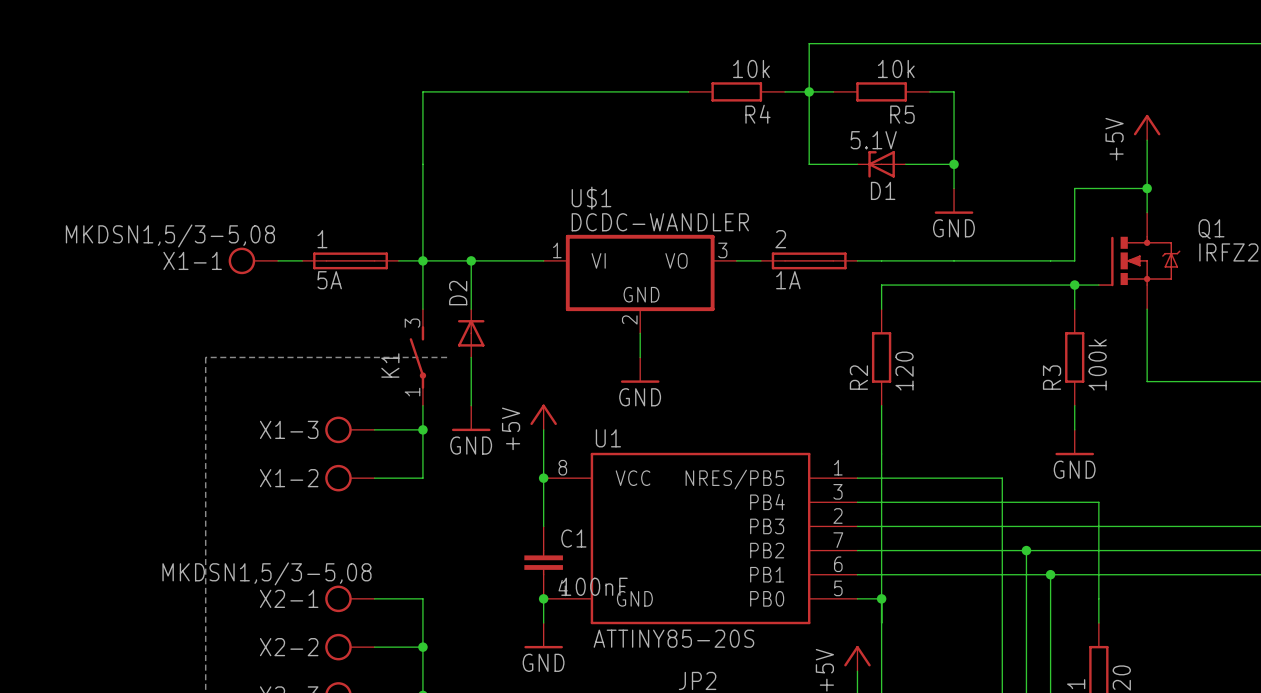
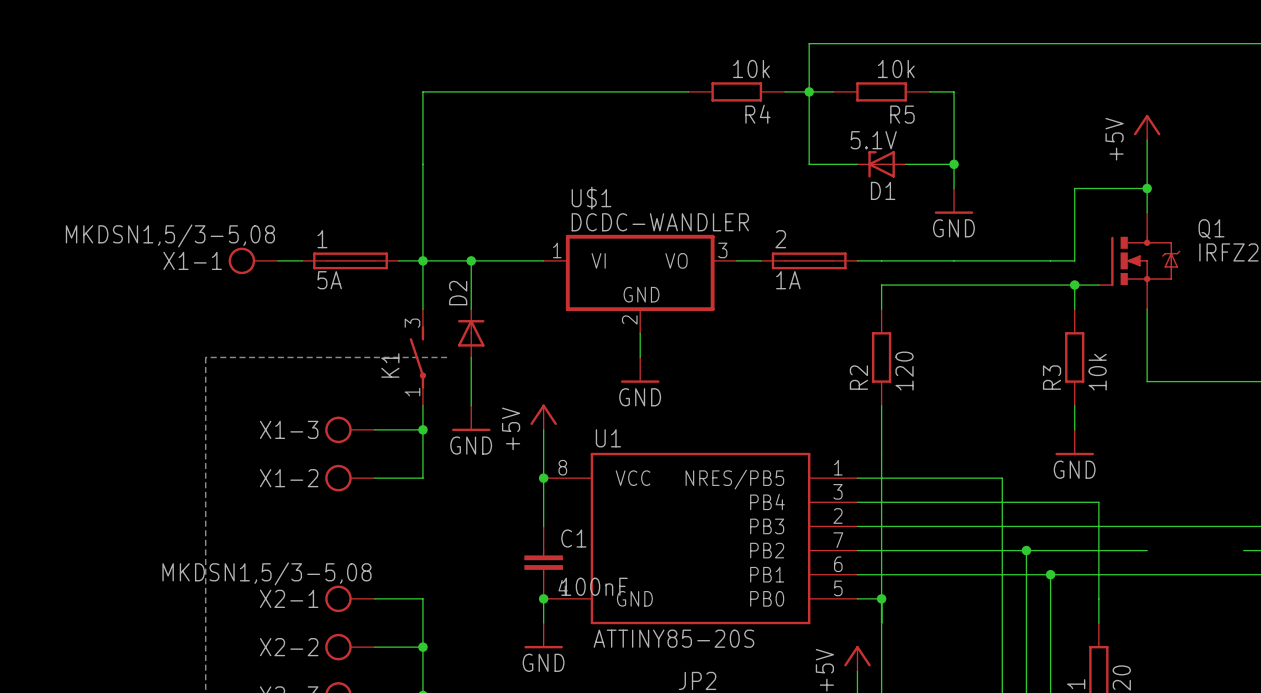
R3 value: 100k (1097, 364) -> 10k (1097, 372)
wire: (1147, 550) (1243, 550) -> none

